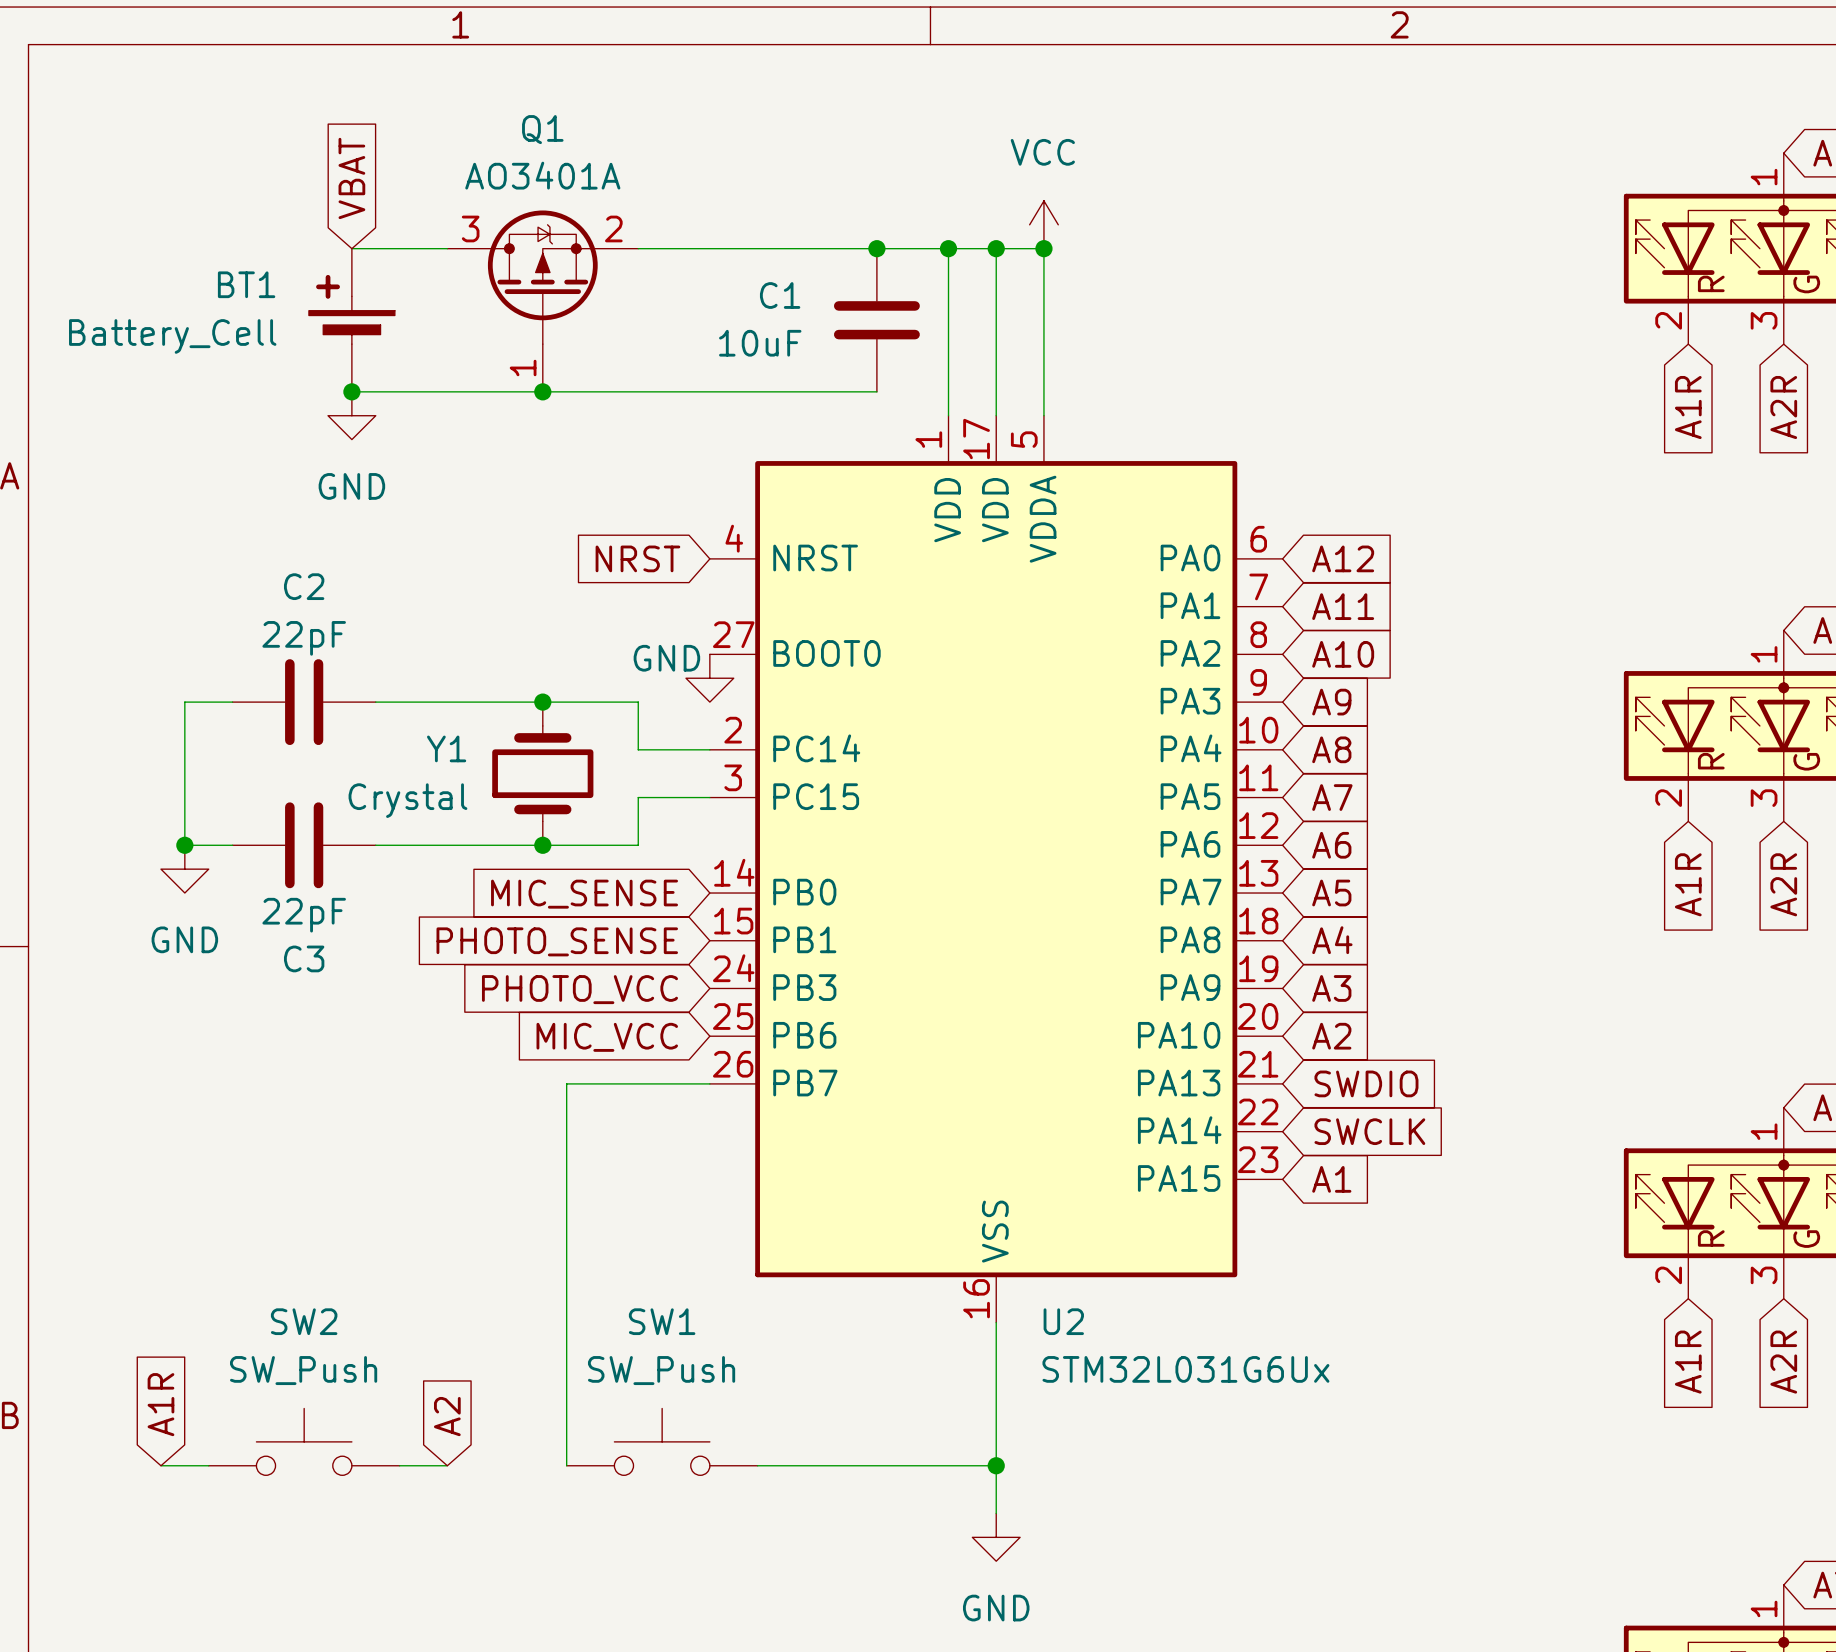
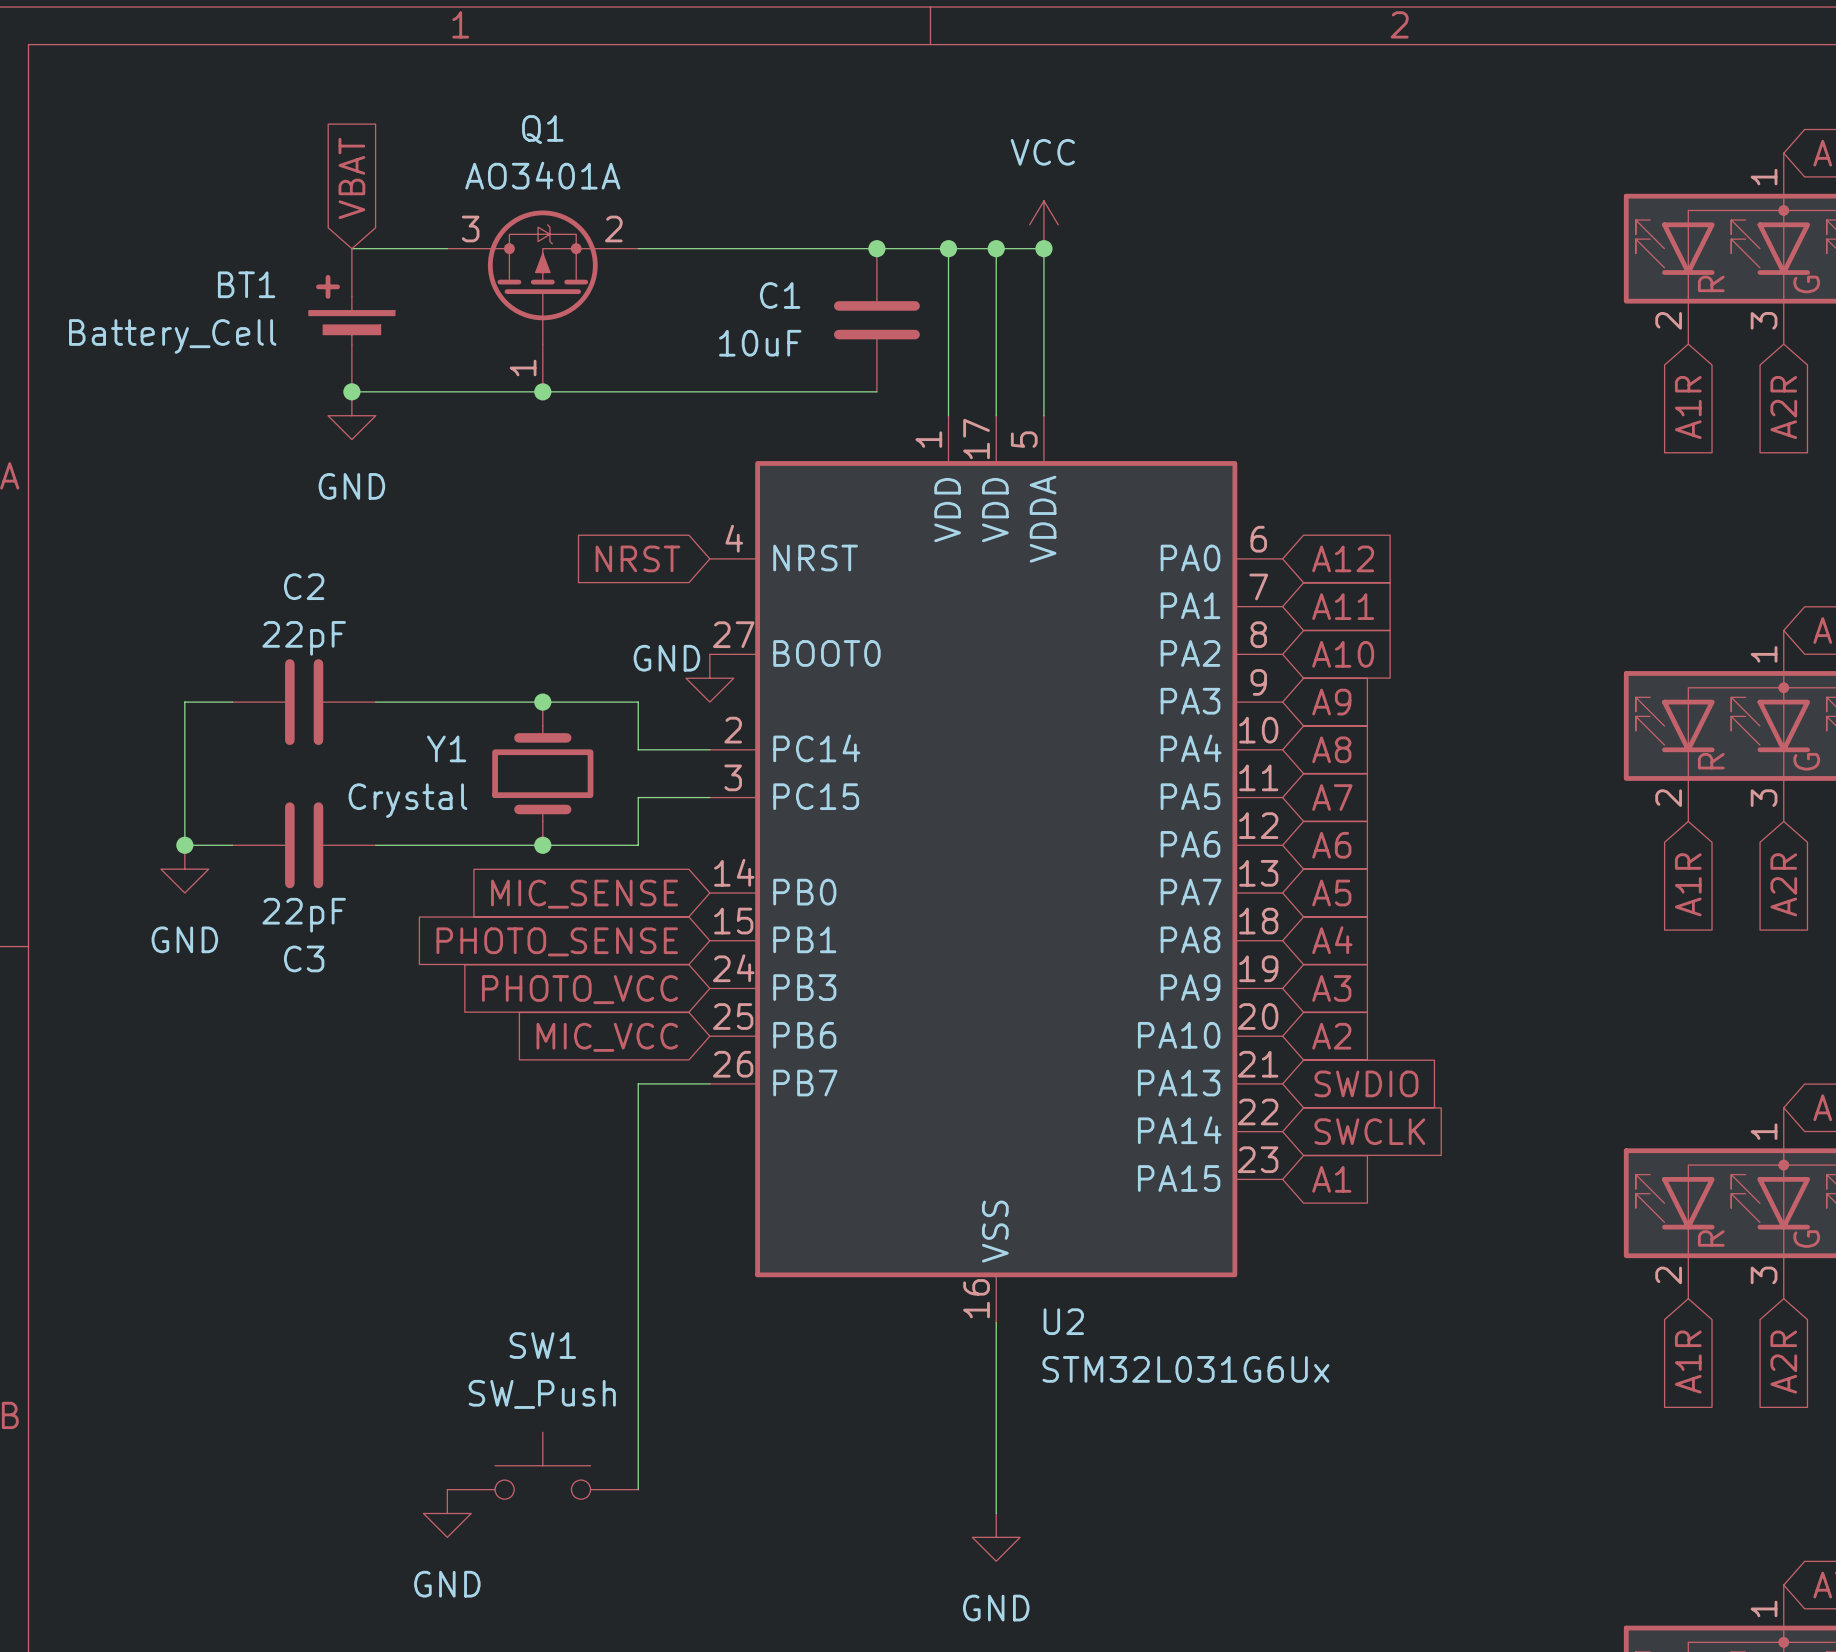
wire: (638, 1083) (566, 1083) (566, 1465) -> (638, 1083) (638, 1489)
global label: A1R (160, 1404) -> none
global label: A2 (447, 1416) -> none
SW2: SW_Push (304, 1441) -> none
SW1 position: (662, 1441) -> (542, 1465)
wire: (160, 1465) (208, 1465) -> none
wire: (399, 1465) (447, 1465) -> none
wire: (757, 1465) (996, 1465) -> none
junction: (996, 1465) -> none
power symbol: none -> GND (447, 1513)

